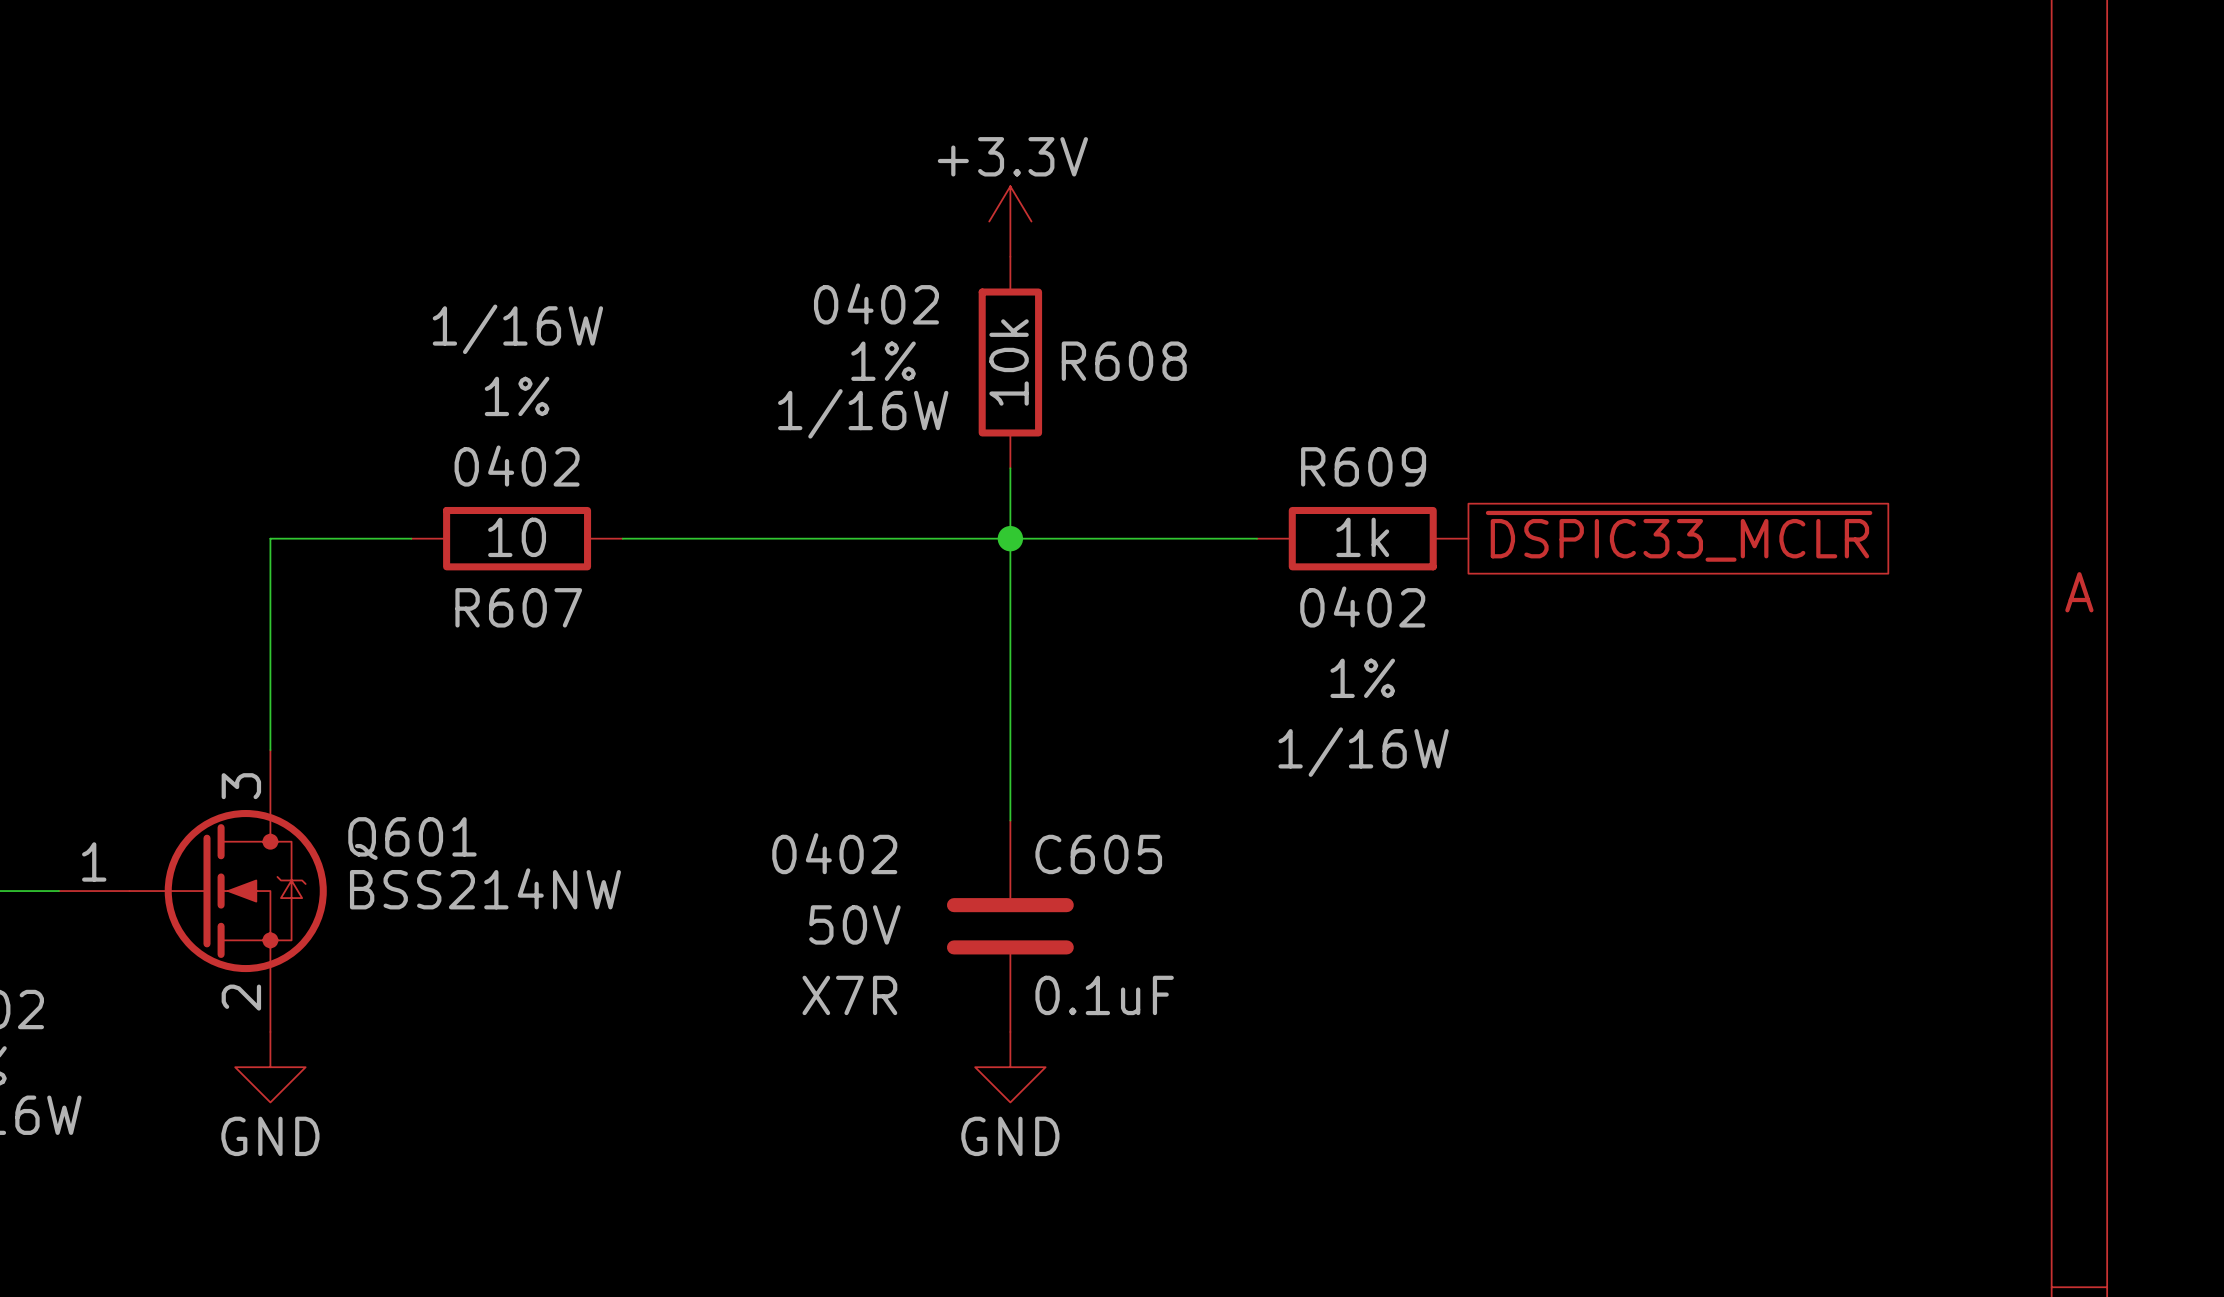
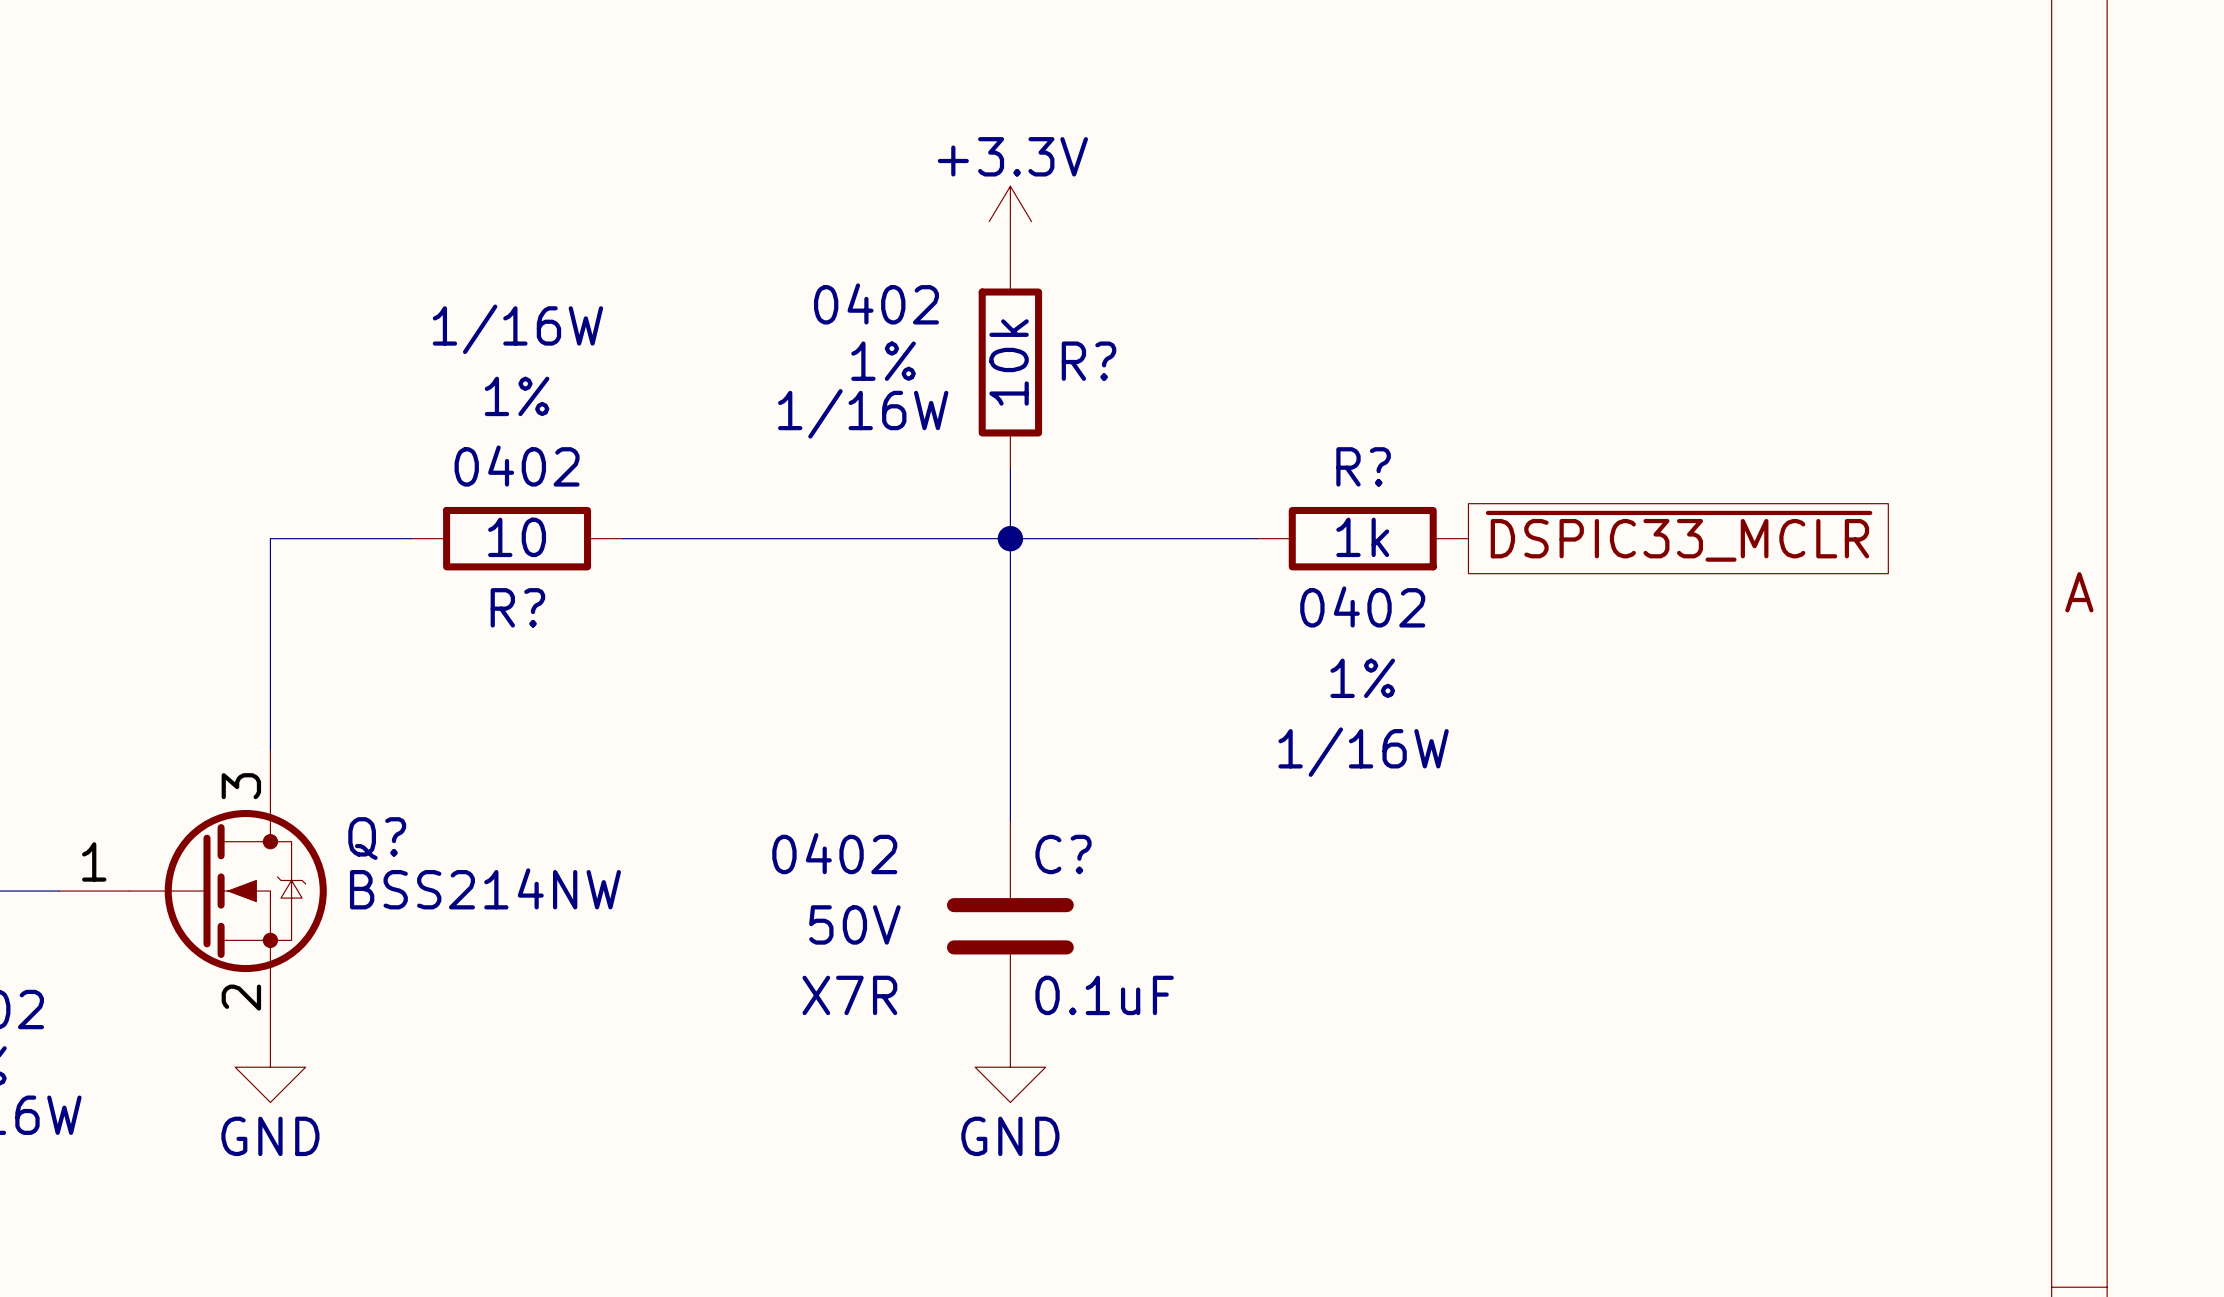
R608 name: R608 (1124, 361) -> R? (1089, 361)
R609 name: R609 (1363, 466) -> R? (1363, 466)
R607 name: R607 (518, 607) -> R? (517, 607)
Q601 name: Q601 (412, 838) -> Q? (377, 838)
C605 name: C605 (1098, 854) -> C? (1063, 854)

